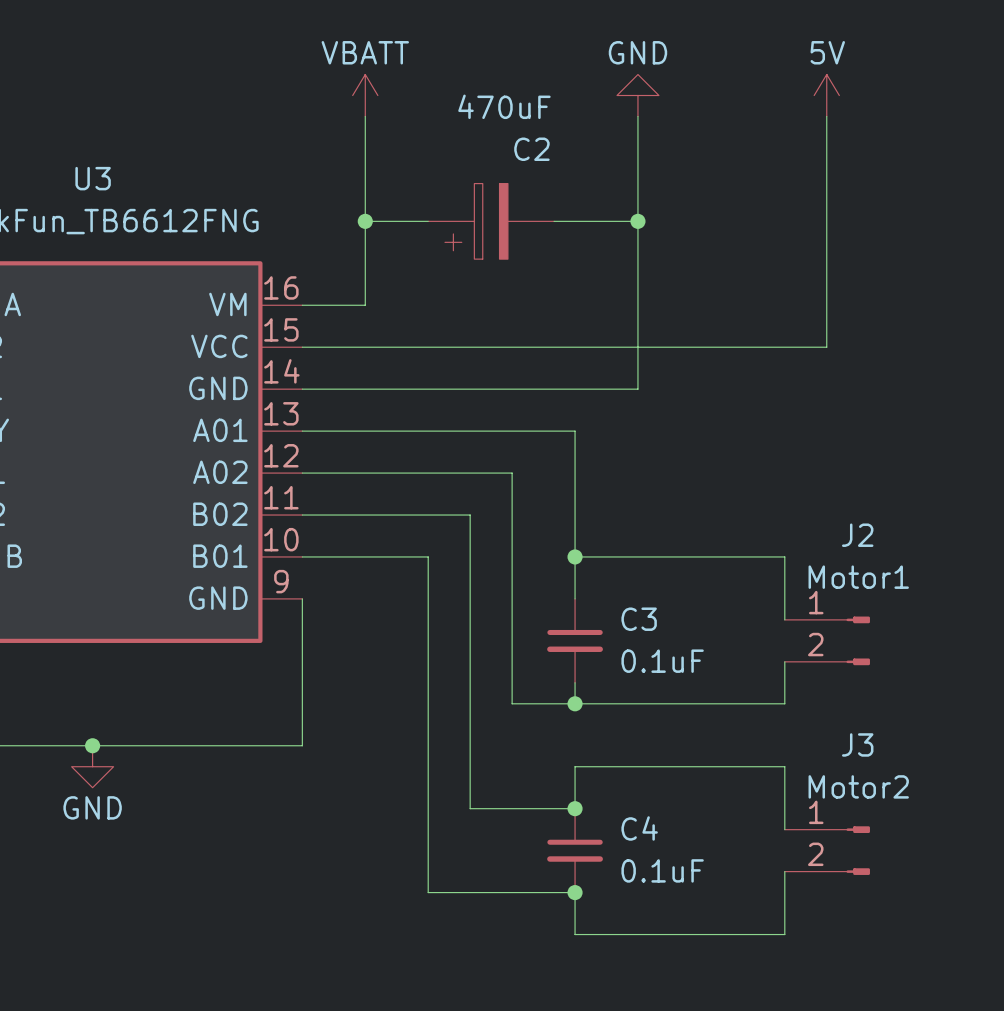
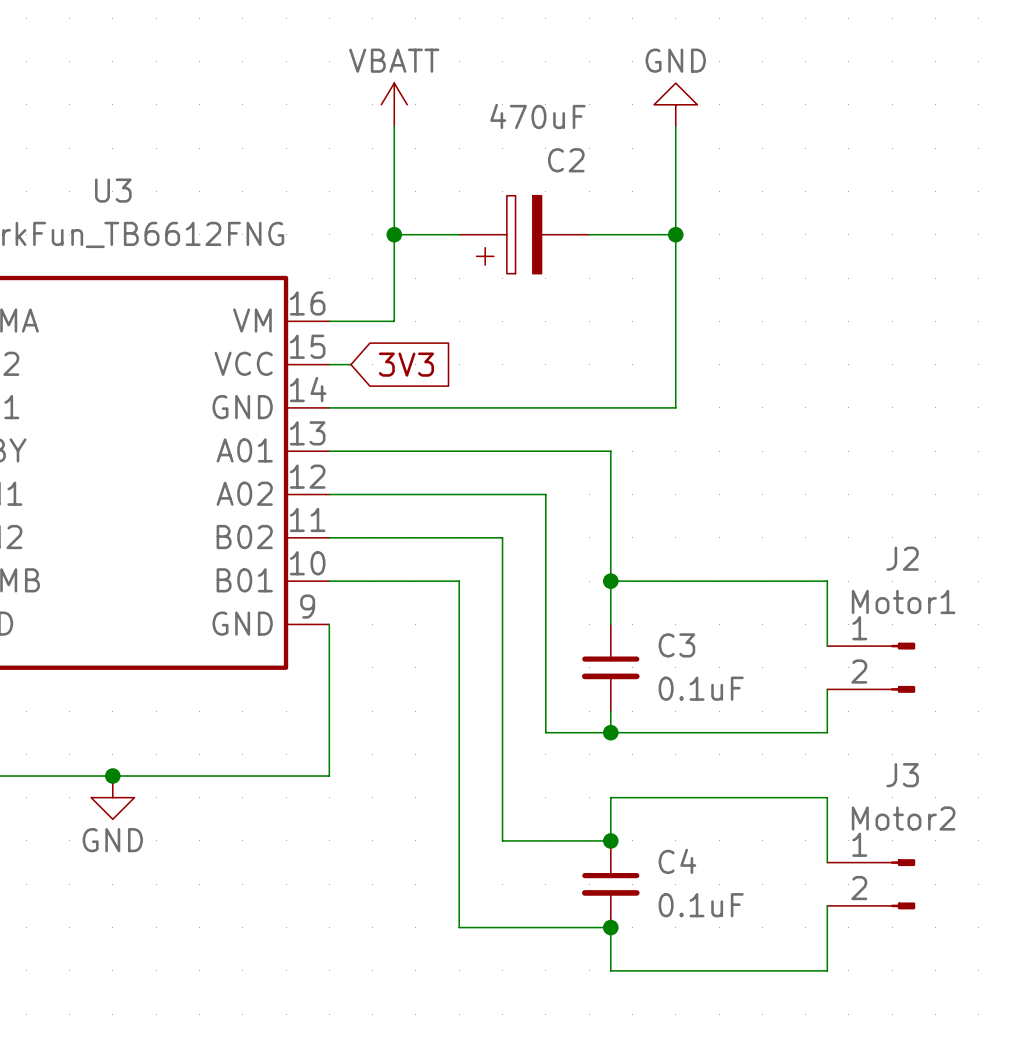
power symbol: 5V (826, 95) -> none
wire: (826, 116) (826, 347) (323, 347) -> none
global label: none -> 3V3 (406, 364)

